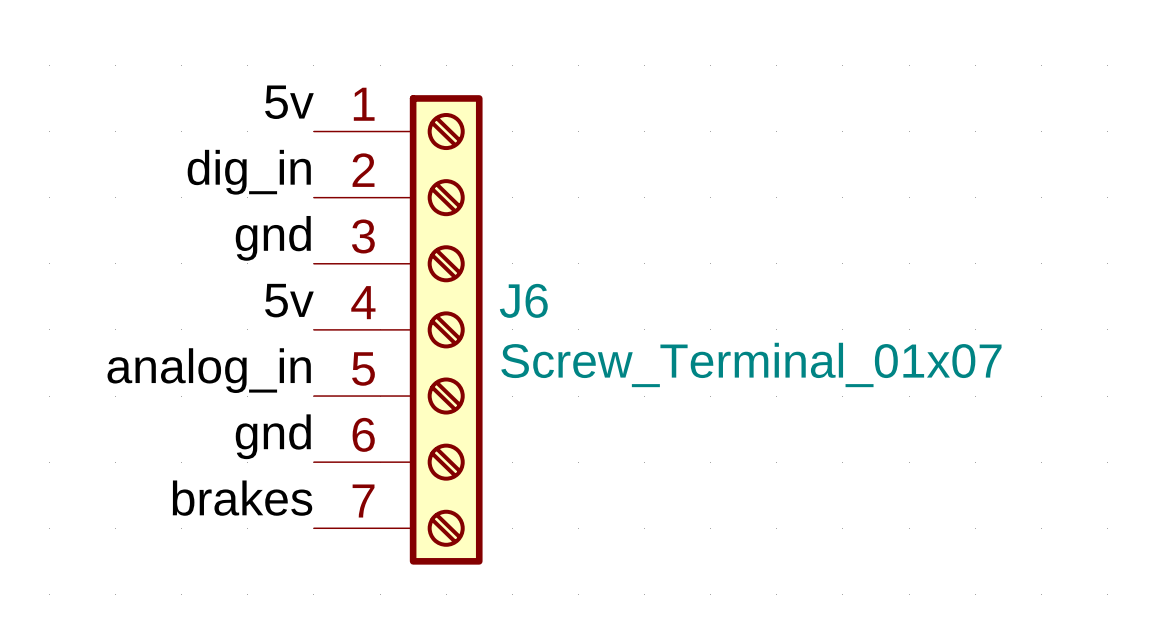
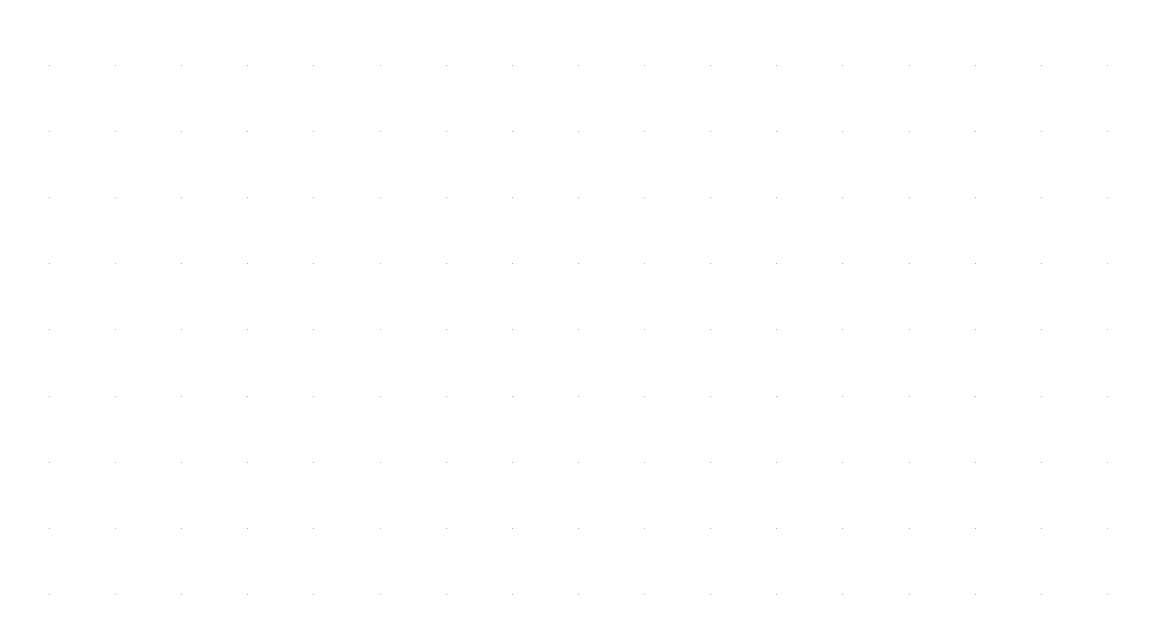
label: 5v (289, 102) -> none
label: dig_in (249, 172) -> none
label: gnd (273, 238) -> none
label: 5v (289, 300) -> none
J6: Screw_Terminal_01x07 (398, 329) -> none
label: analog_in (209, 370) -> none
label: gnd (273, 436) -> none
label: brakes (242, 498) -> none

